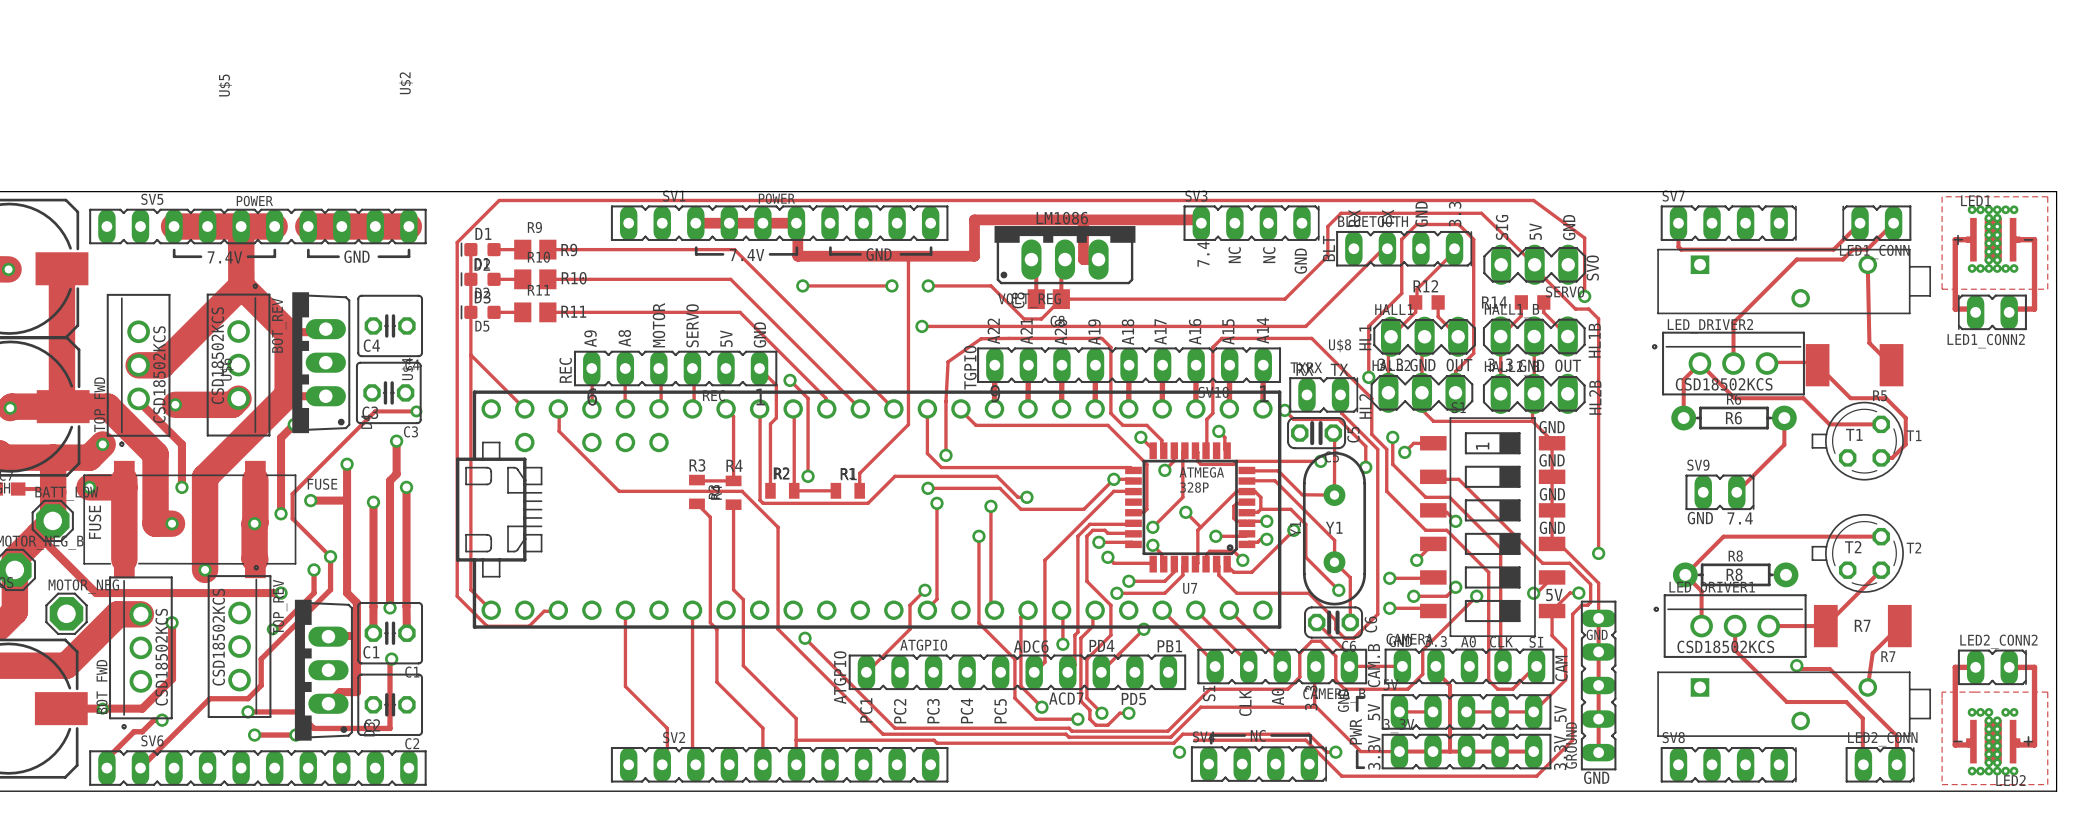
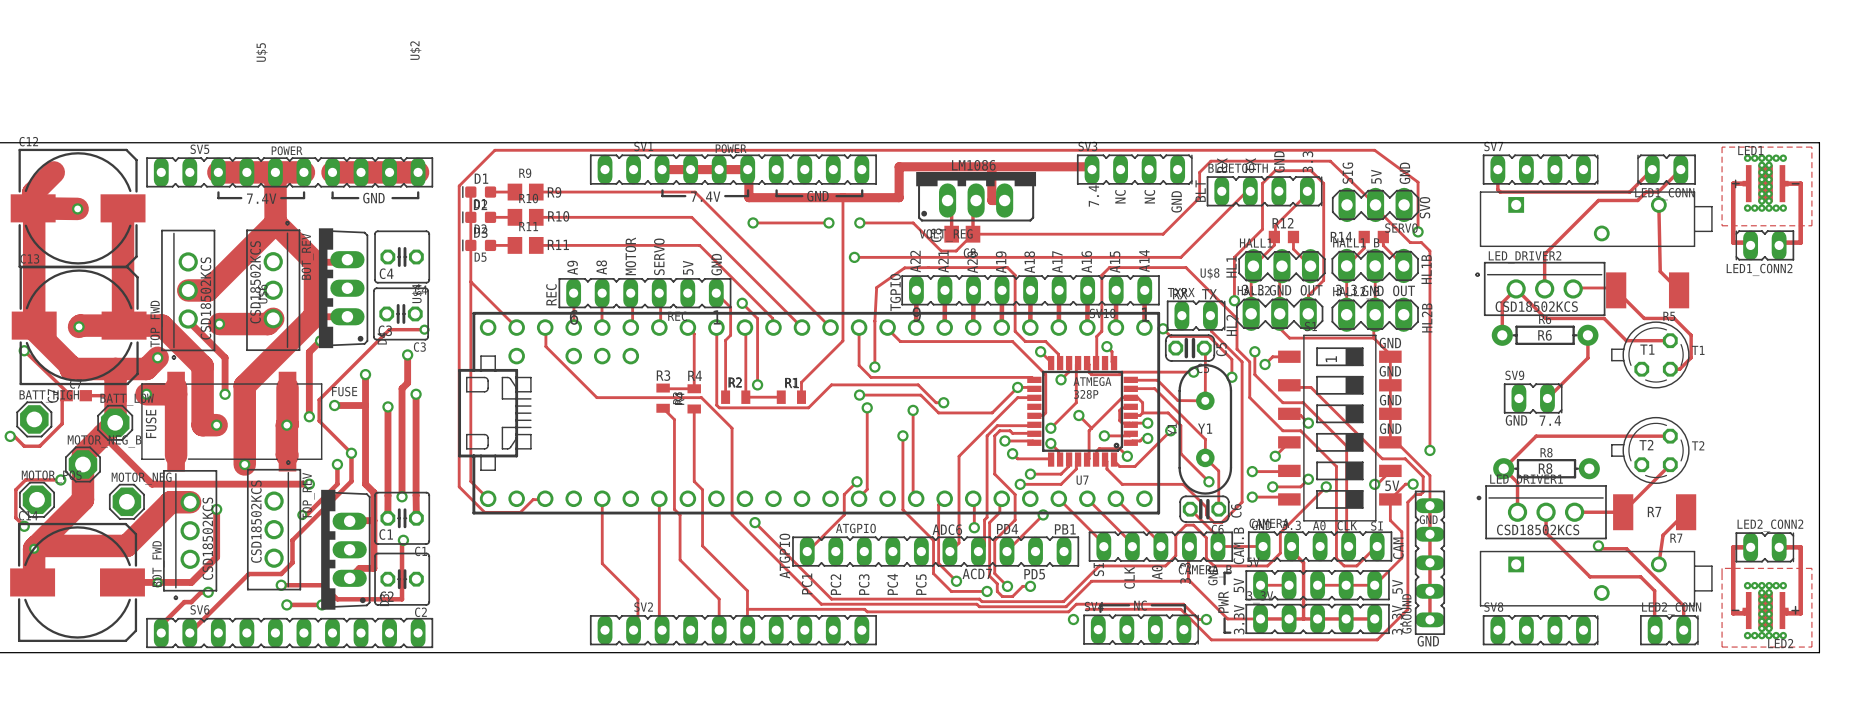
via: none -> (1769, 585)

